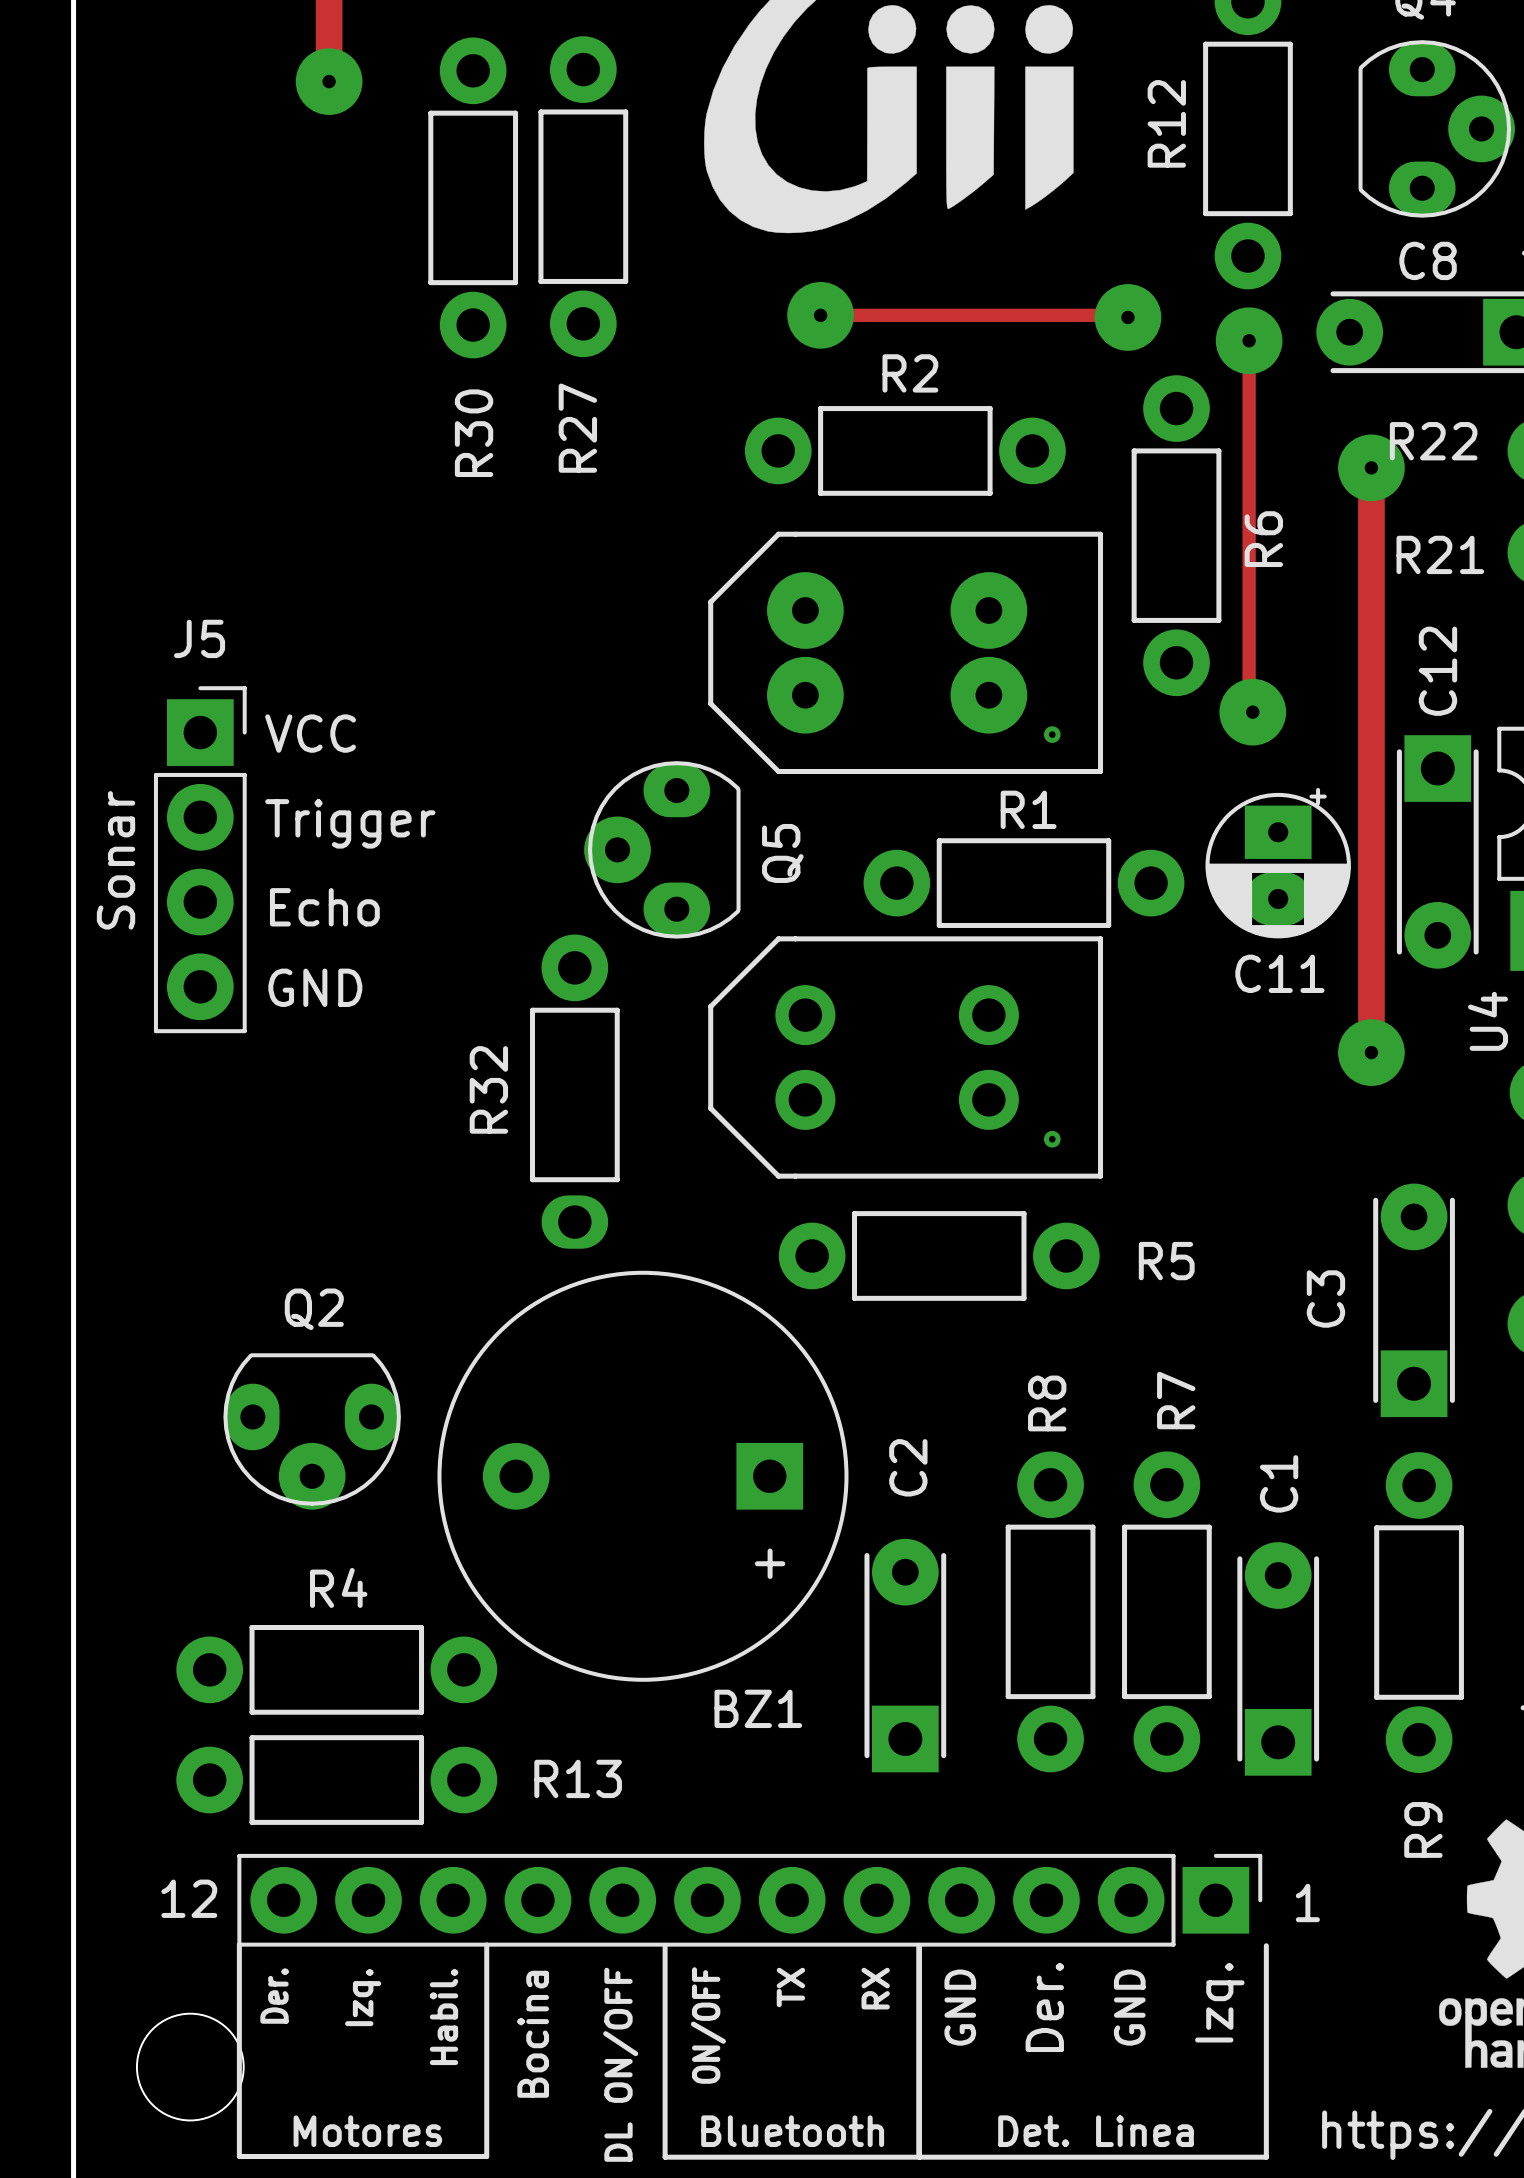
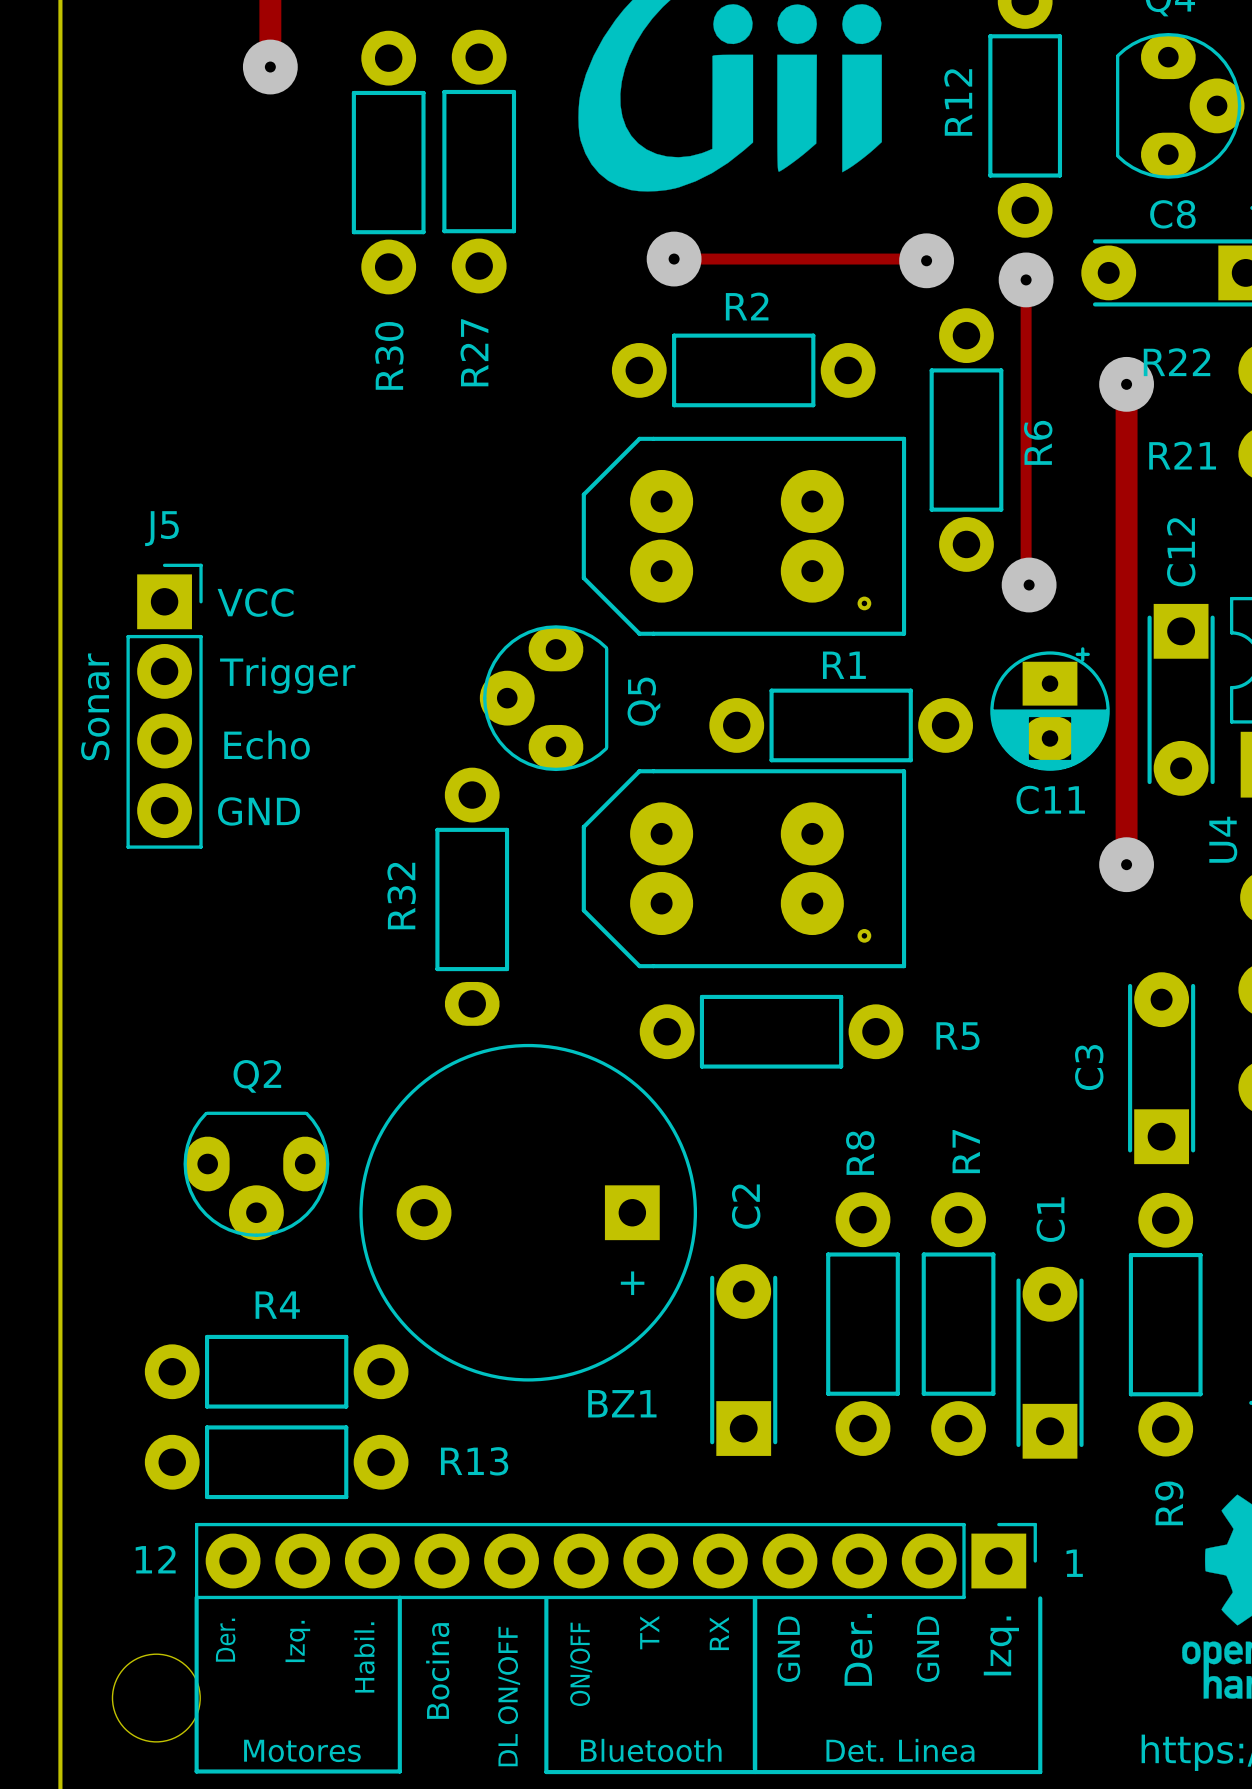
part footprint: [708, 936, 1104, 1179] -> [581, 769, 907, 969]

